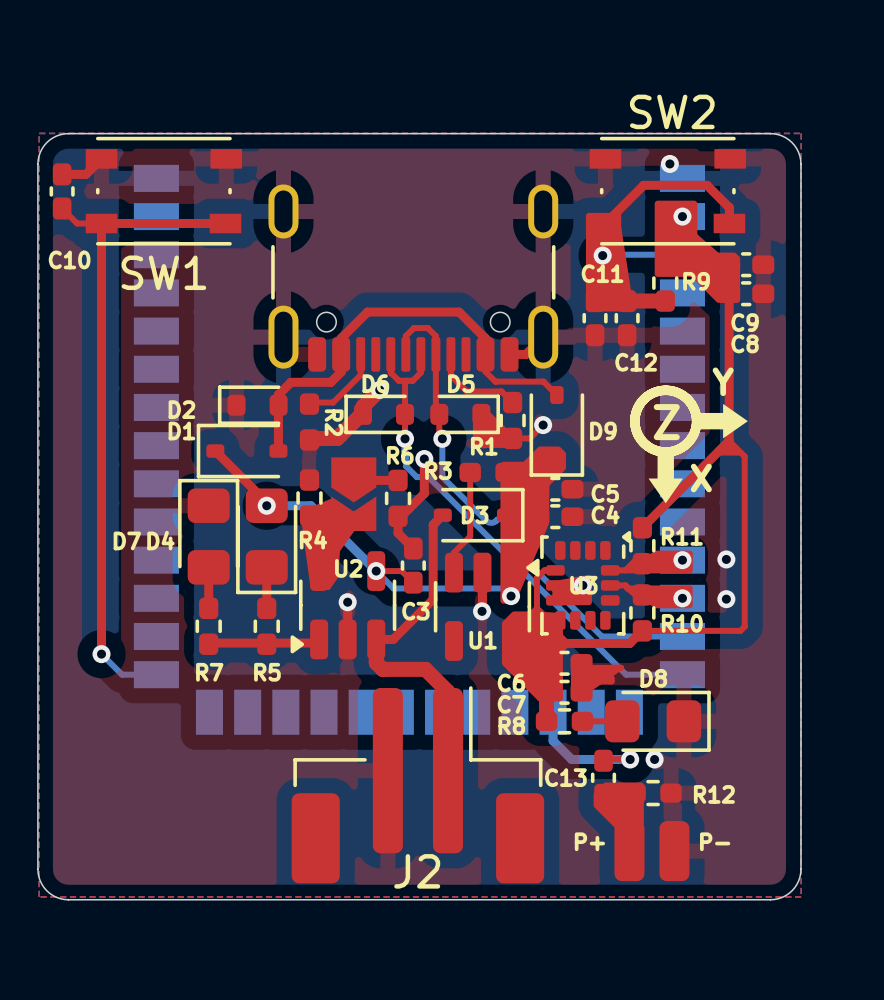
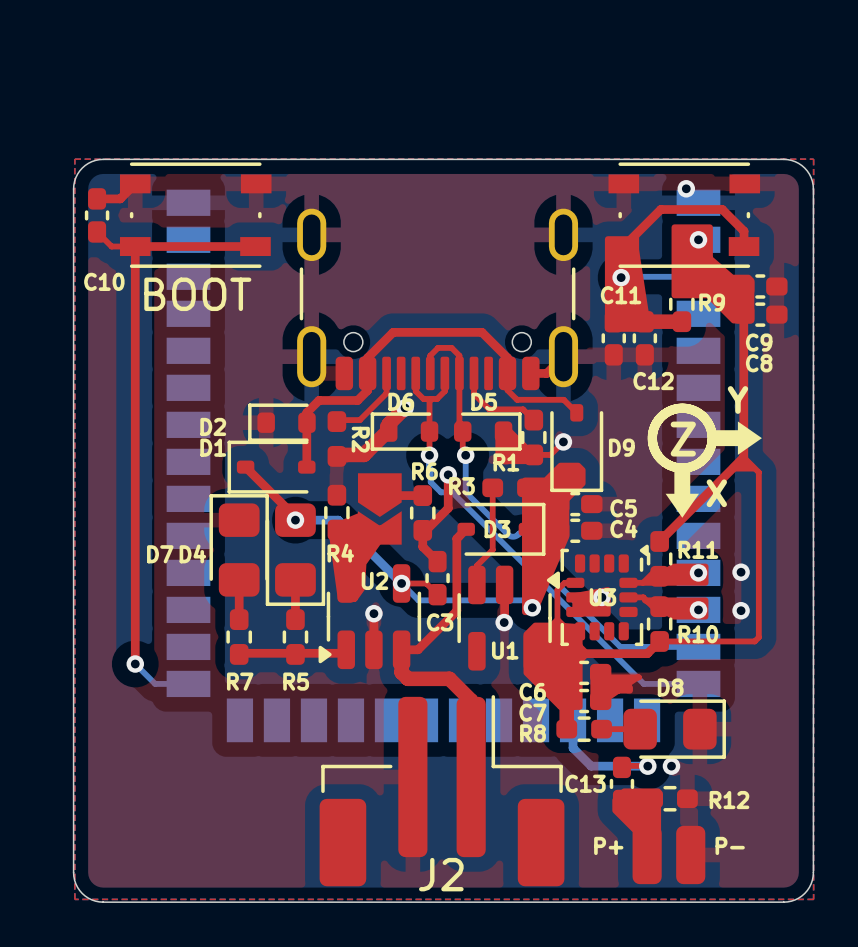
SW2 name: SW2 (672, 111) -> none
SW1 name: SW1 (163, 272) -> BOOT (197, 294)

